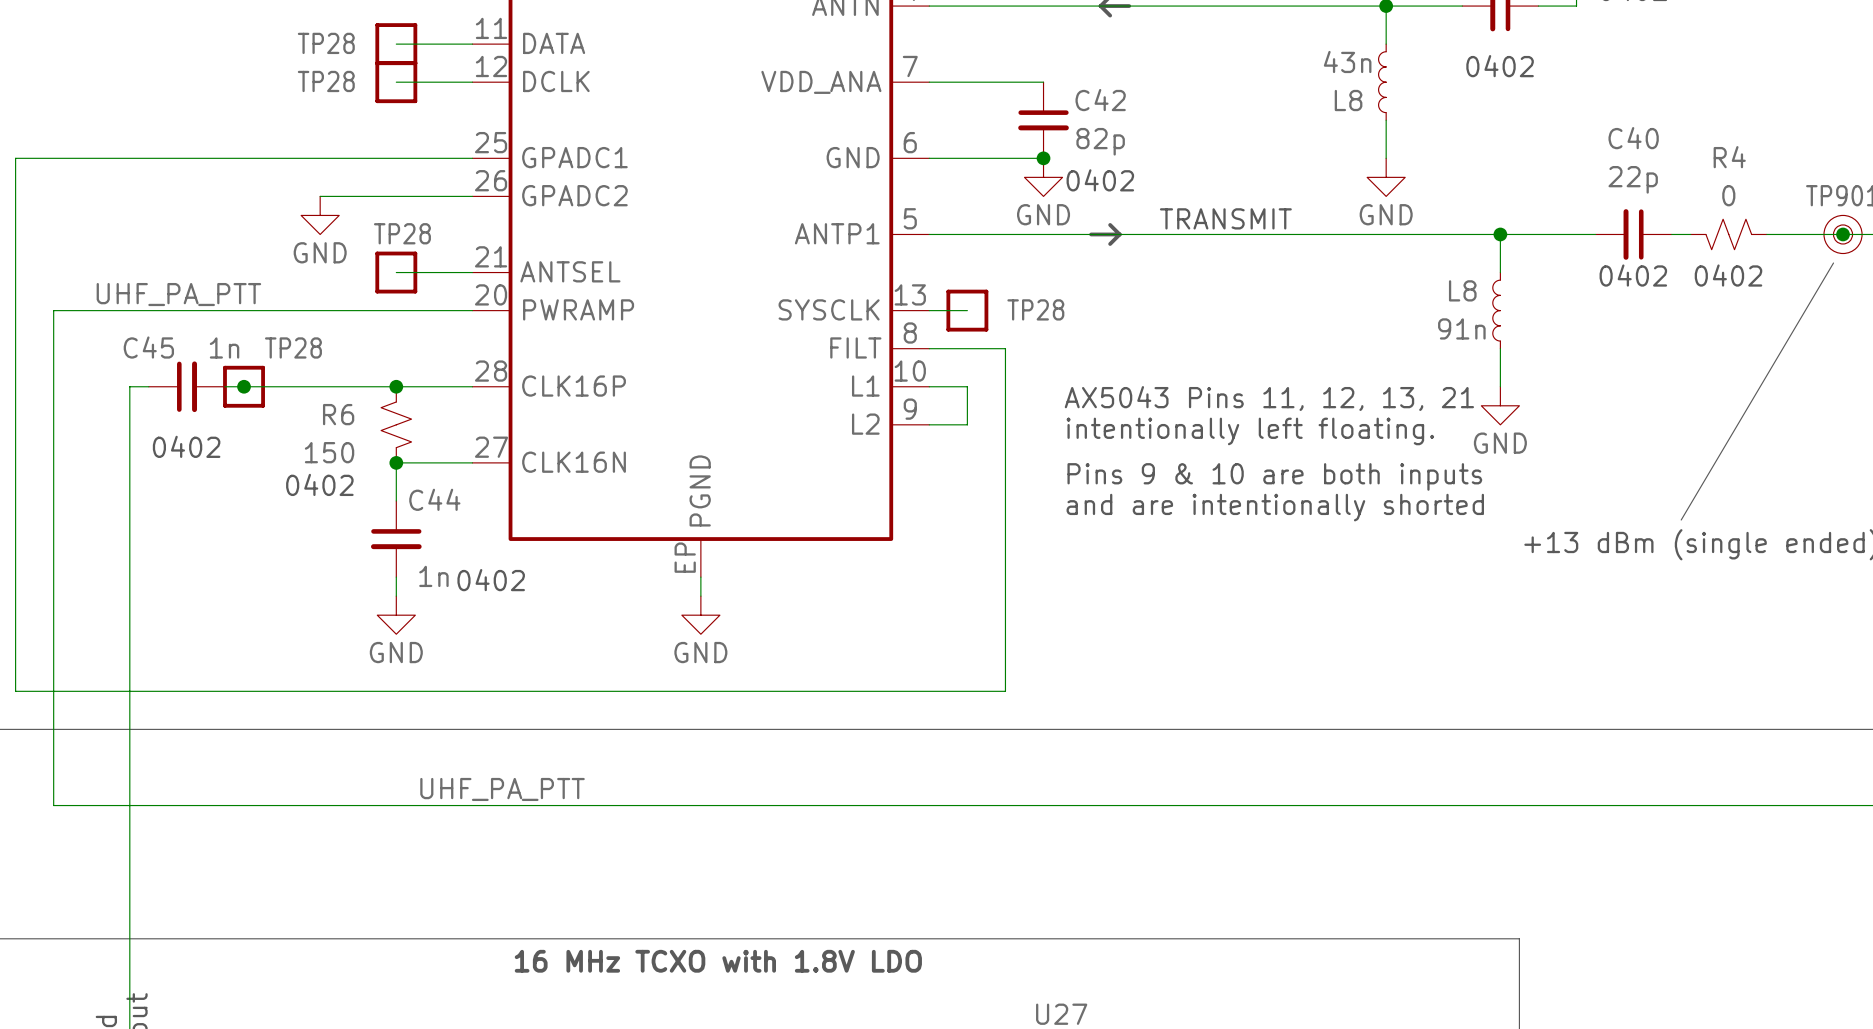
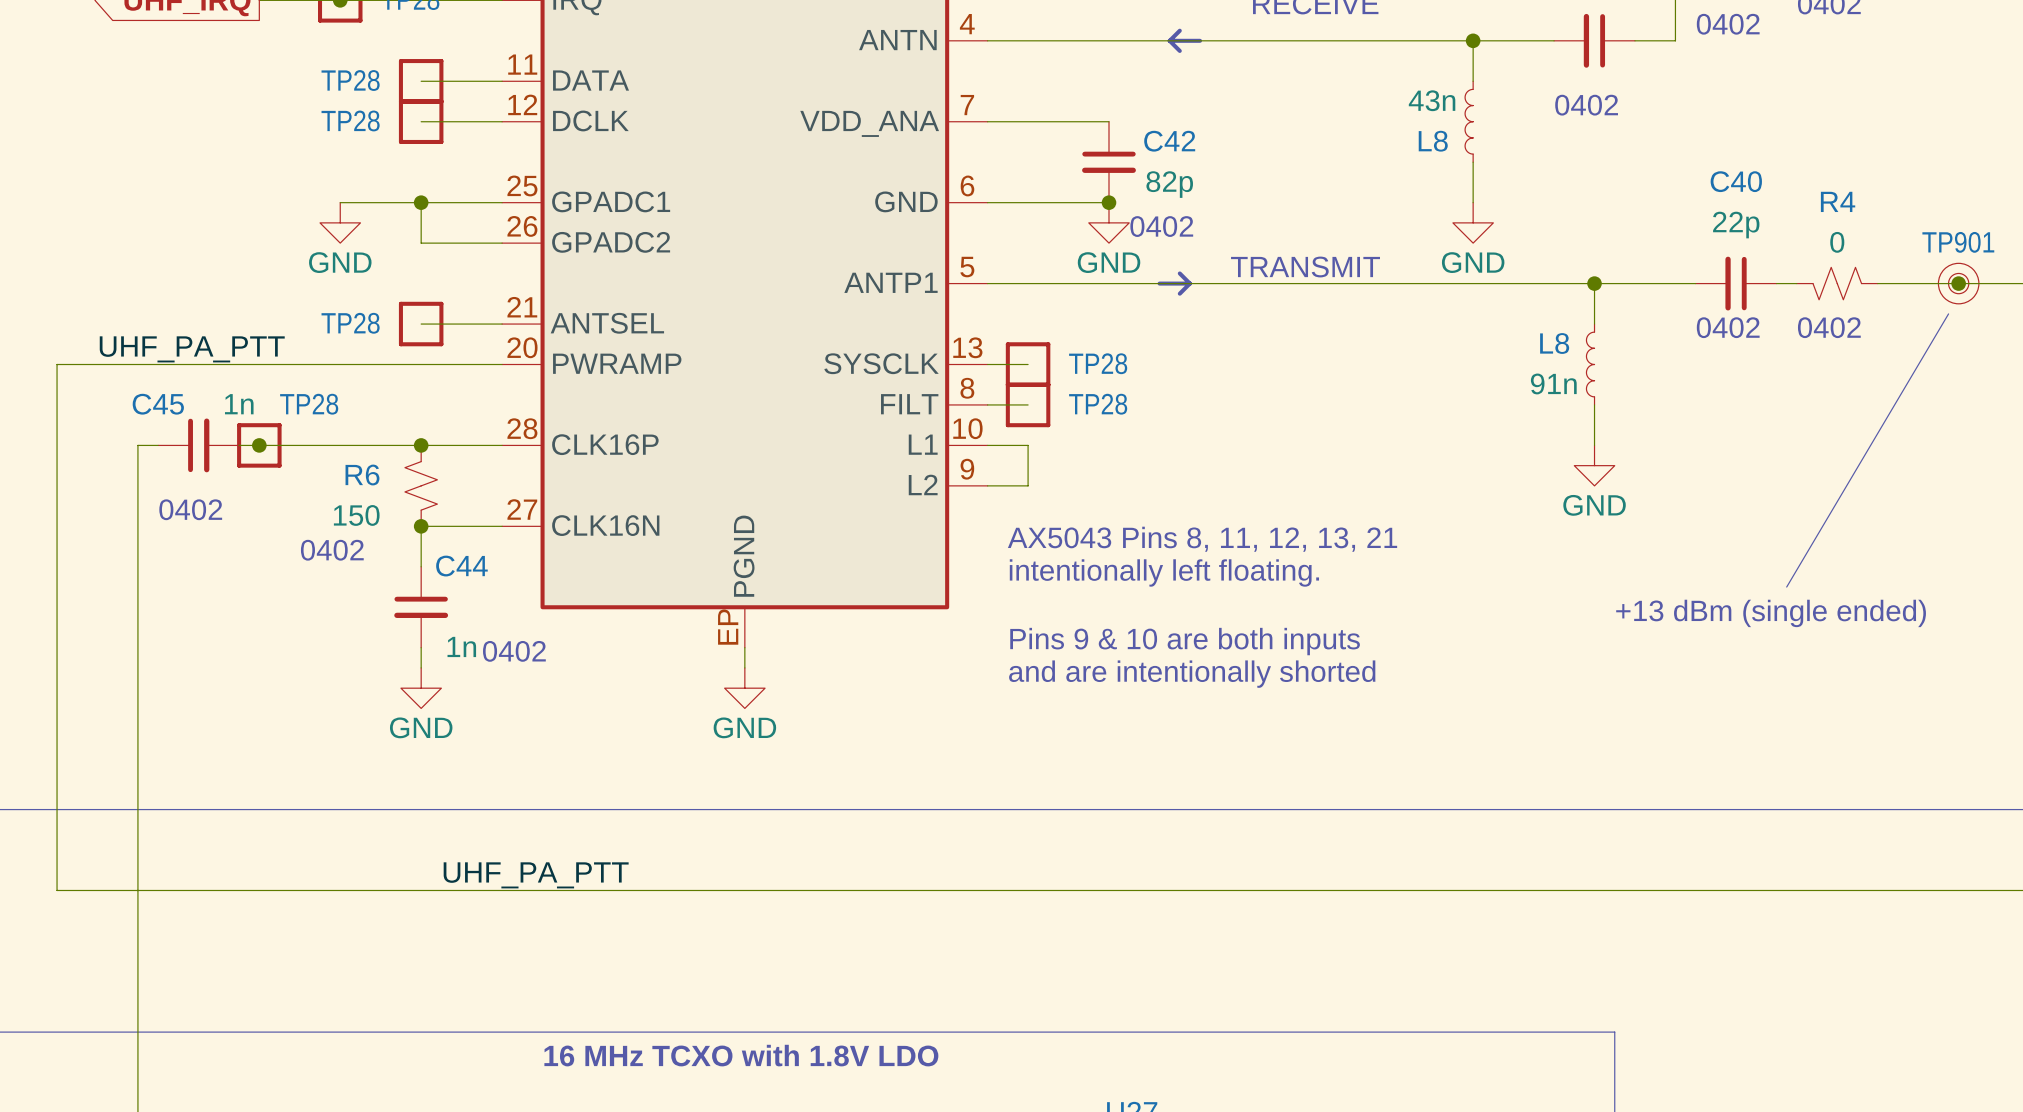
wire: (320, 158) (15, 158) (15, 691) (1005, 691) (1005, 348) (967, 348) -> none
junction: none -> (421, 202)
wire: (320, 196) (396, 196) -> (421, 202) (421, 243)
power symbol position: GND (320, 215) -> GND (340, 222)
TP28 name position: TP28 (402, 233) -> TP28 (350, 323)
TP28: none -> (1028, 404)
text: AX5043 Pins 11, 12, 13, 21 (1269, 398) -> none
text position: intentionally left floating. (1250, 431) -> intentionally left floating. (1164, 572)
text: none -> AX5043 Pins 8, 11, 12, 13, 21 (1202, 539)
text position: Pins 9 & 10 are both inputs (1274, 476) -> Pins 9 & 10 are both inputs (1185, 641)
text position: and are intentionally shorted (1275, 507) -> and are intentionally shorted (1192, 674)

